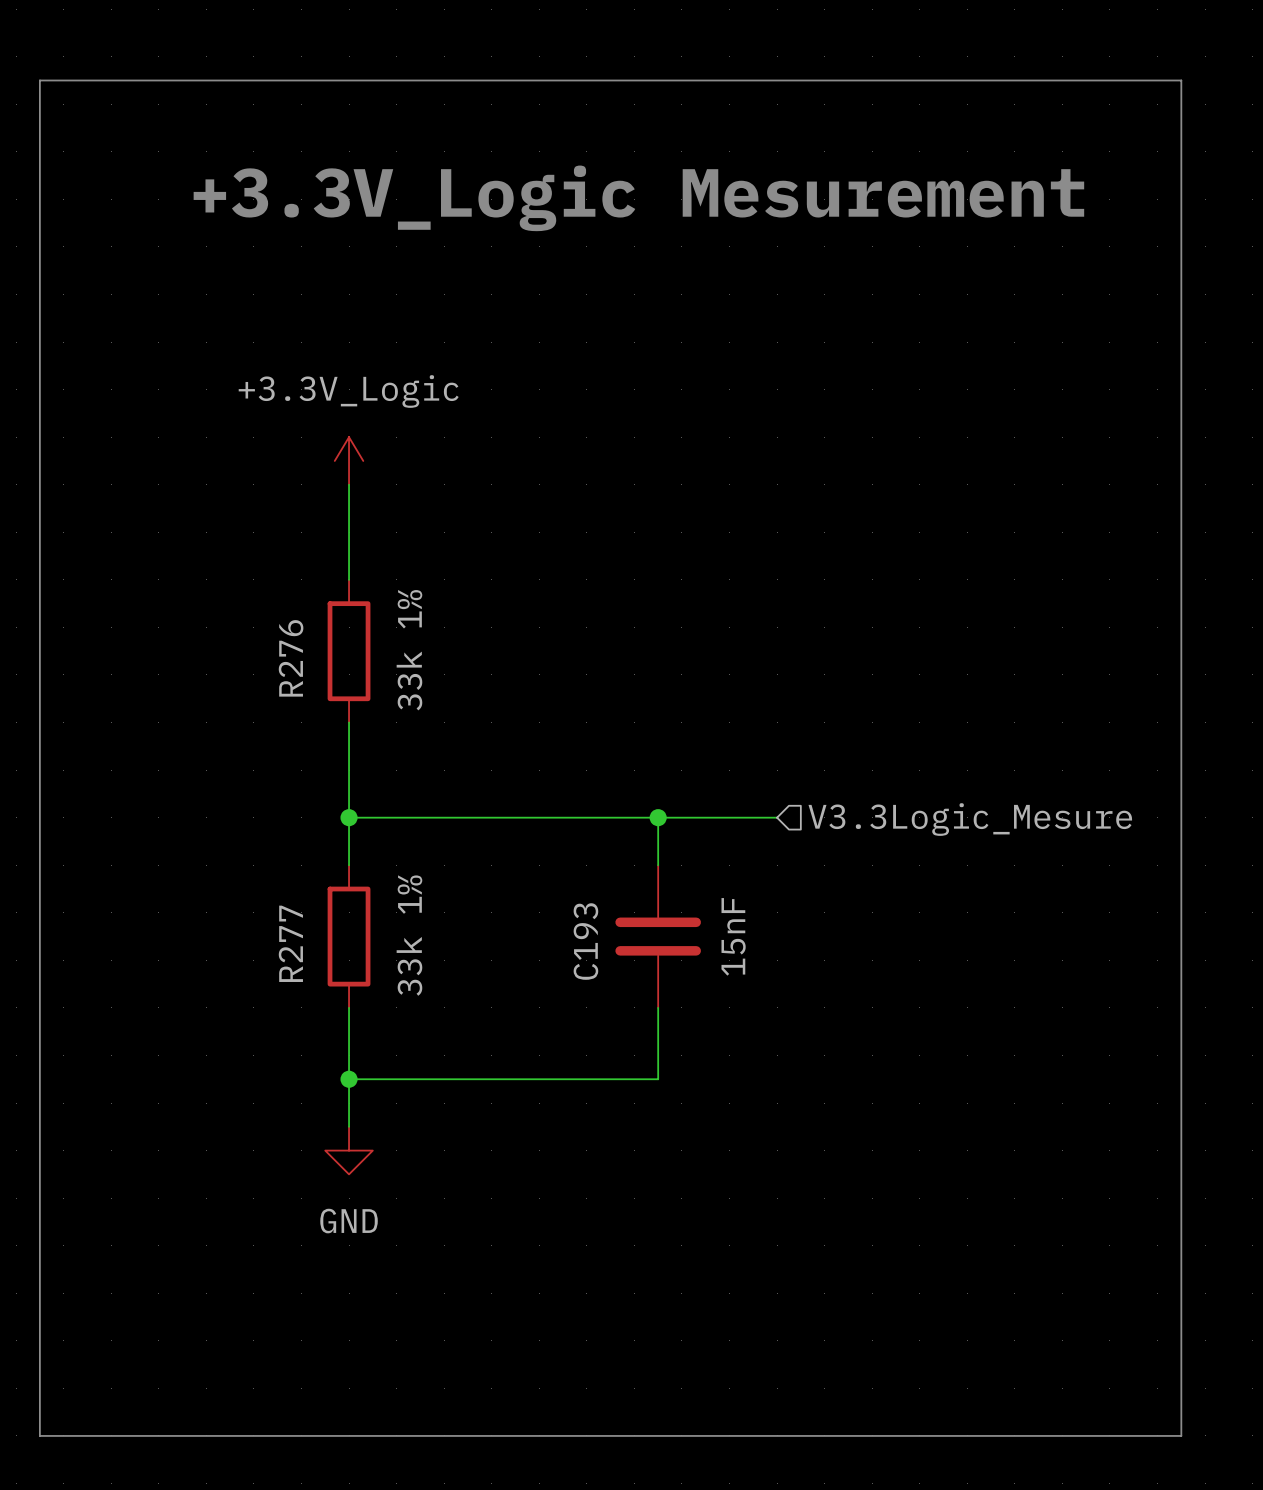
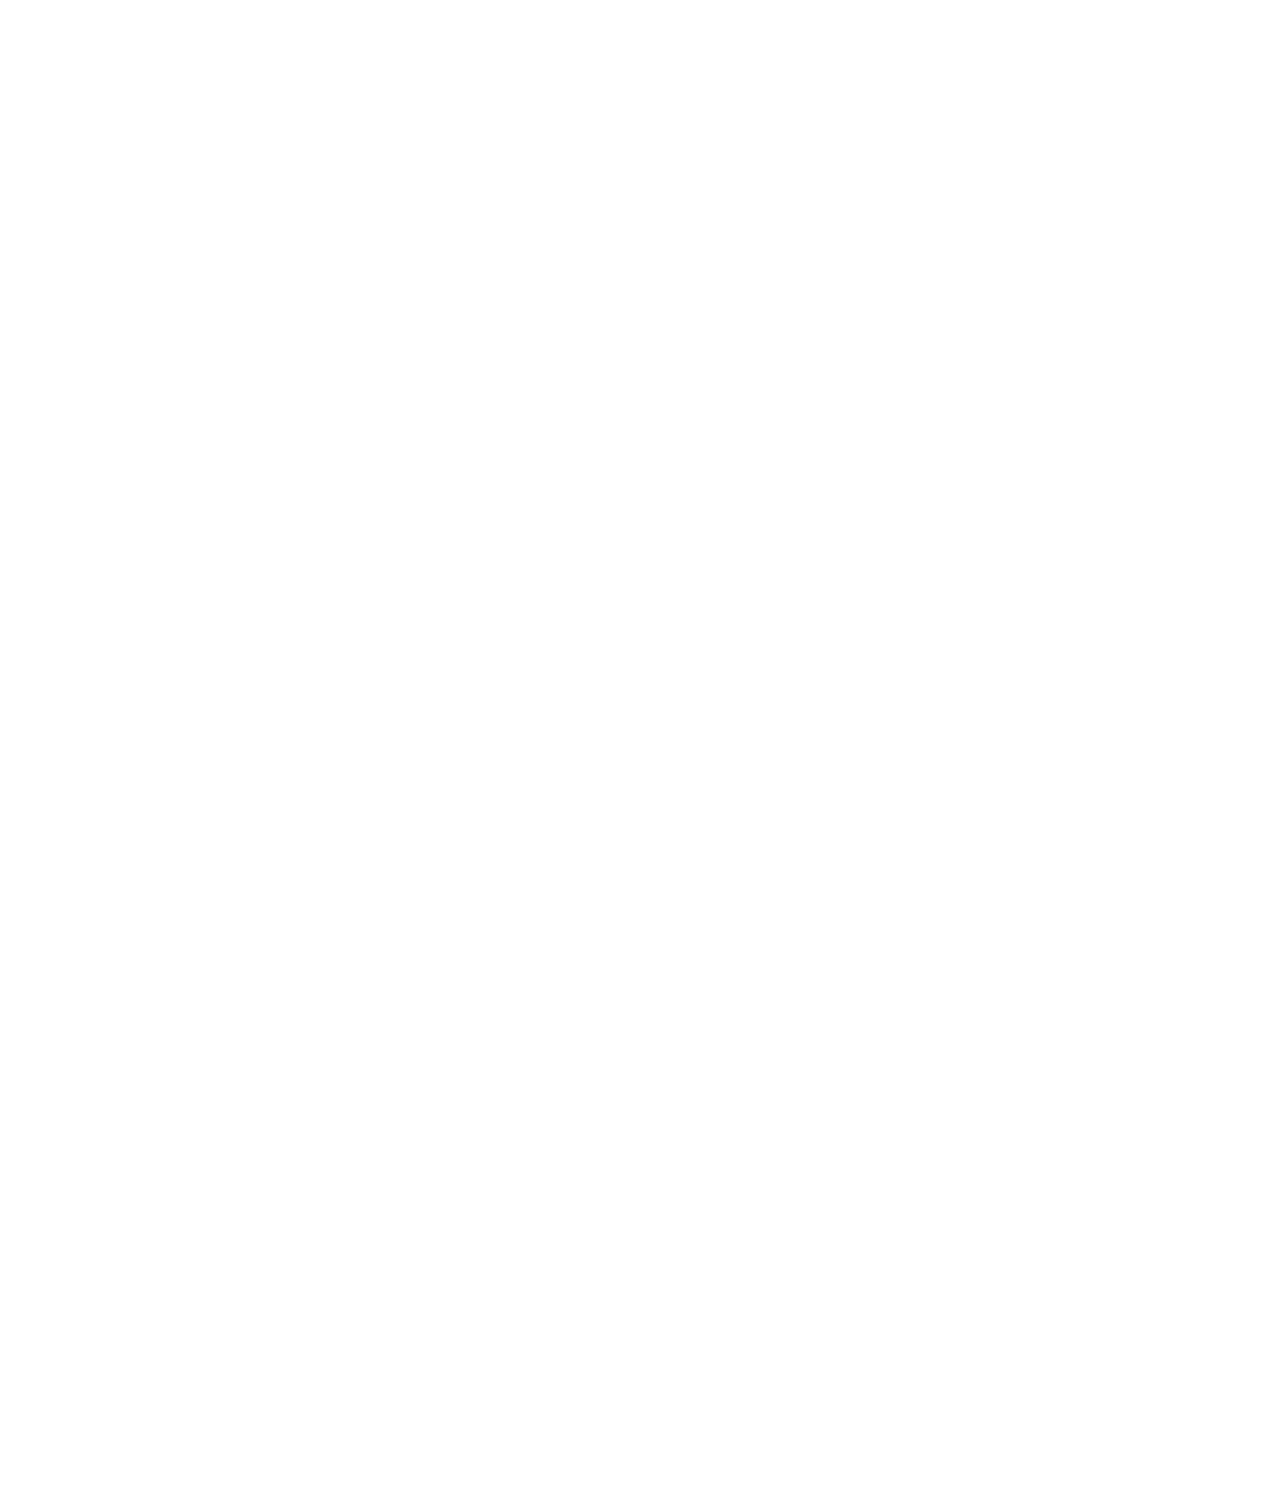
line: (39, 80) (1181, 80) (1181, 1435) (39, 1435) (39, 80) -> none
text: +3.3V_Logic Mesurement (638, 198) -> none
power symbol: +3.3V_Logic (349, 460) -> none
wire: (349, 484) (349, 579) -> none
R276: 33k 1% (349, 651) -> none
wire: (349, 722) (349, 865) -> none
wire: (349, 817) (777, 817) -> none
junction: (349, 817) -> none
wire: (658, 817) (658, 865) -> none
junction: (658, 817) -> none
hierarchical label: V3.3Logic_Mesure (970, 819) -> none
R277: 33k 1% (349, 936) -> none
C193: 15nF (658, 936) -> none
wire: (349, 1007) (349, 1126) -> none
wire: (658, 1007) (658, 1079) (349, 1079) -> none
junction: (349, 1079) -> none
power symbol: GND (349, 1150) -> none

